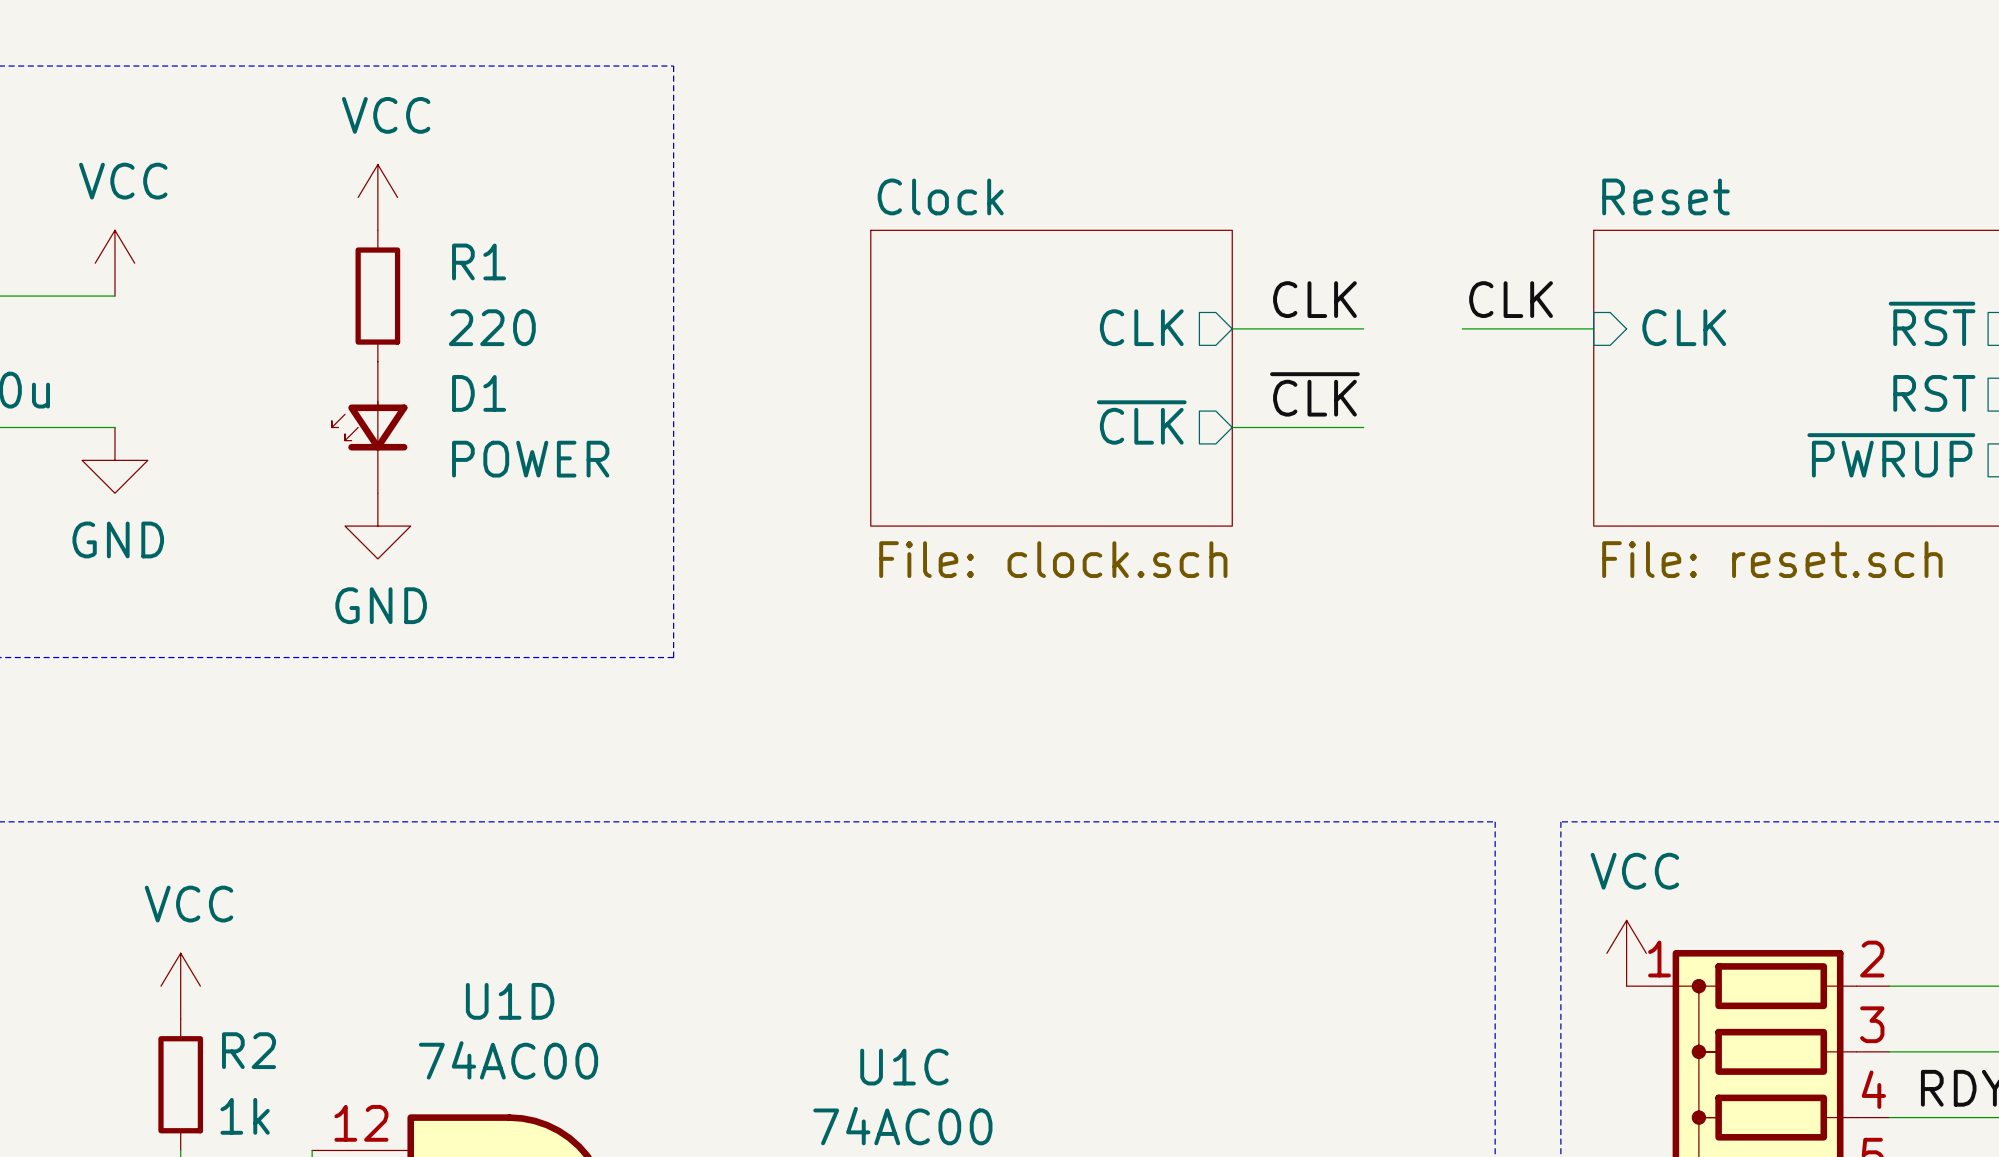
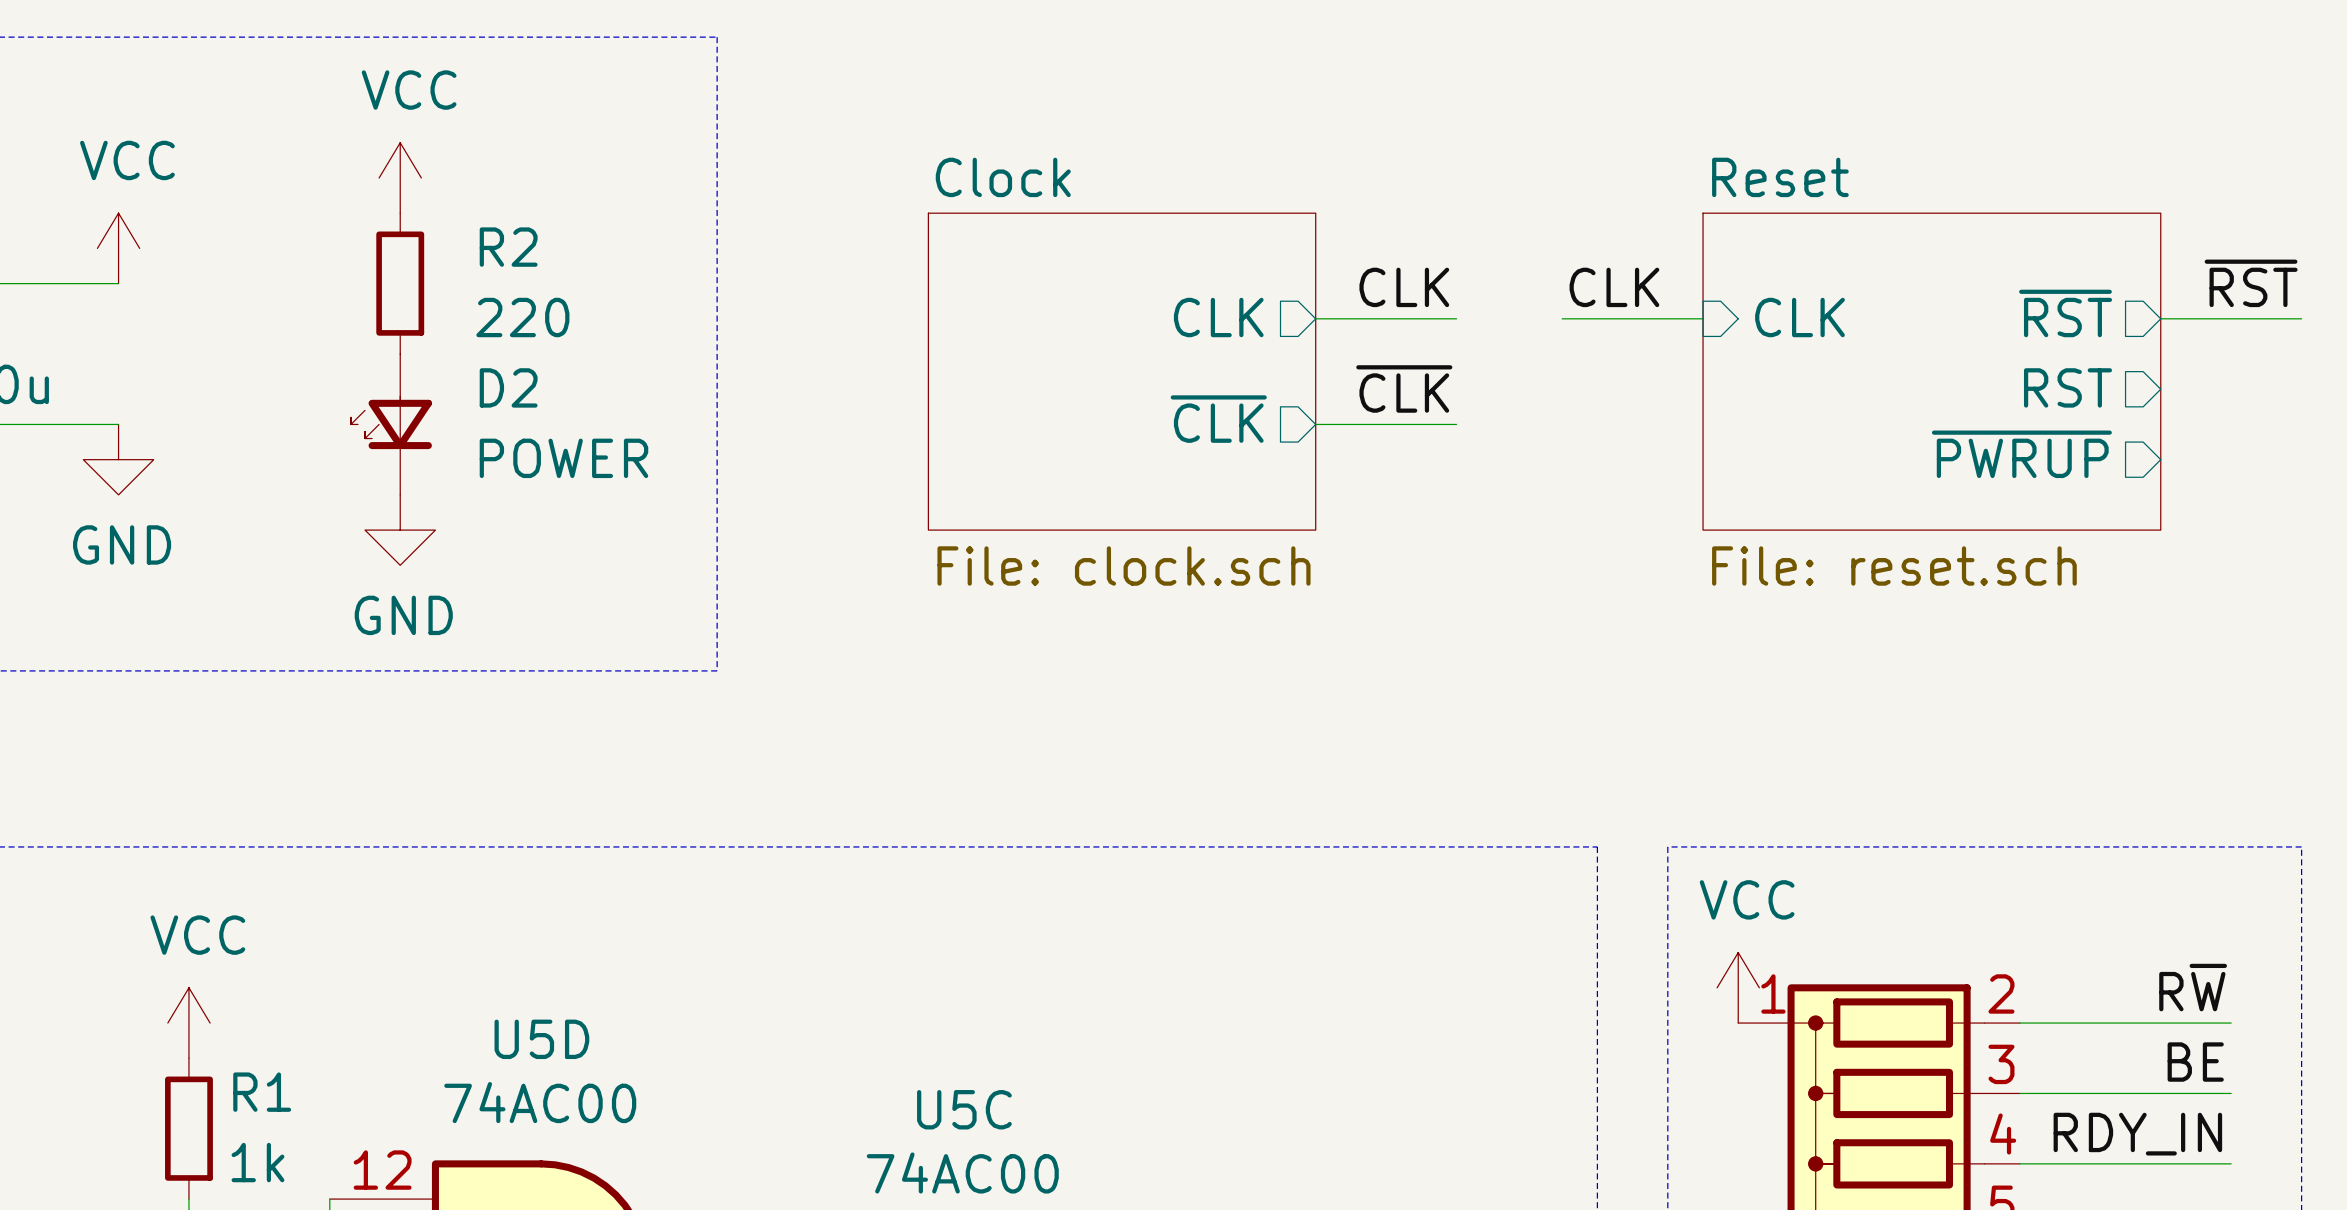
R1 name: R1 (479, 261) -> R2 (508, 247)
D1 name: D1 (479, 393) -> D2 (508, 387)
U1D name: U1D (510, 1001) -> U5D (541, 1039)
R2 name: R2 (249, 1050) -> R1 (262, 1092)
U1C name: U1C (904, 1067) -> U5C (964, 1109)

